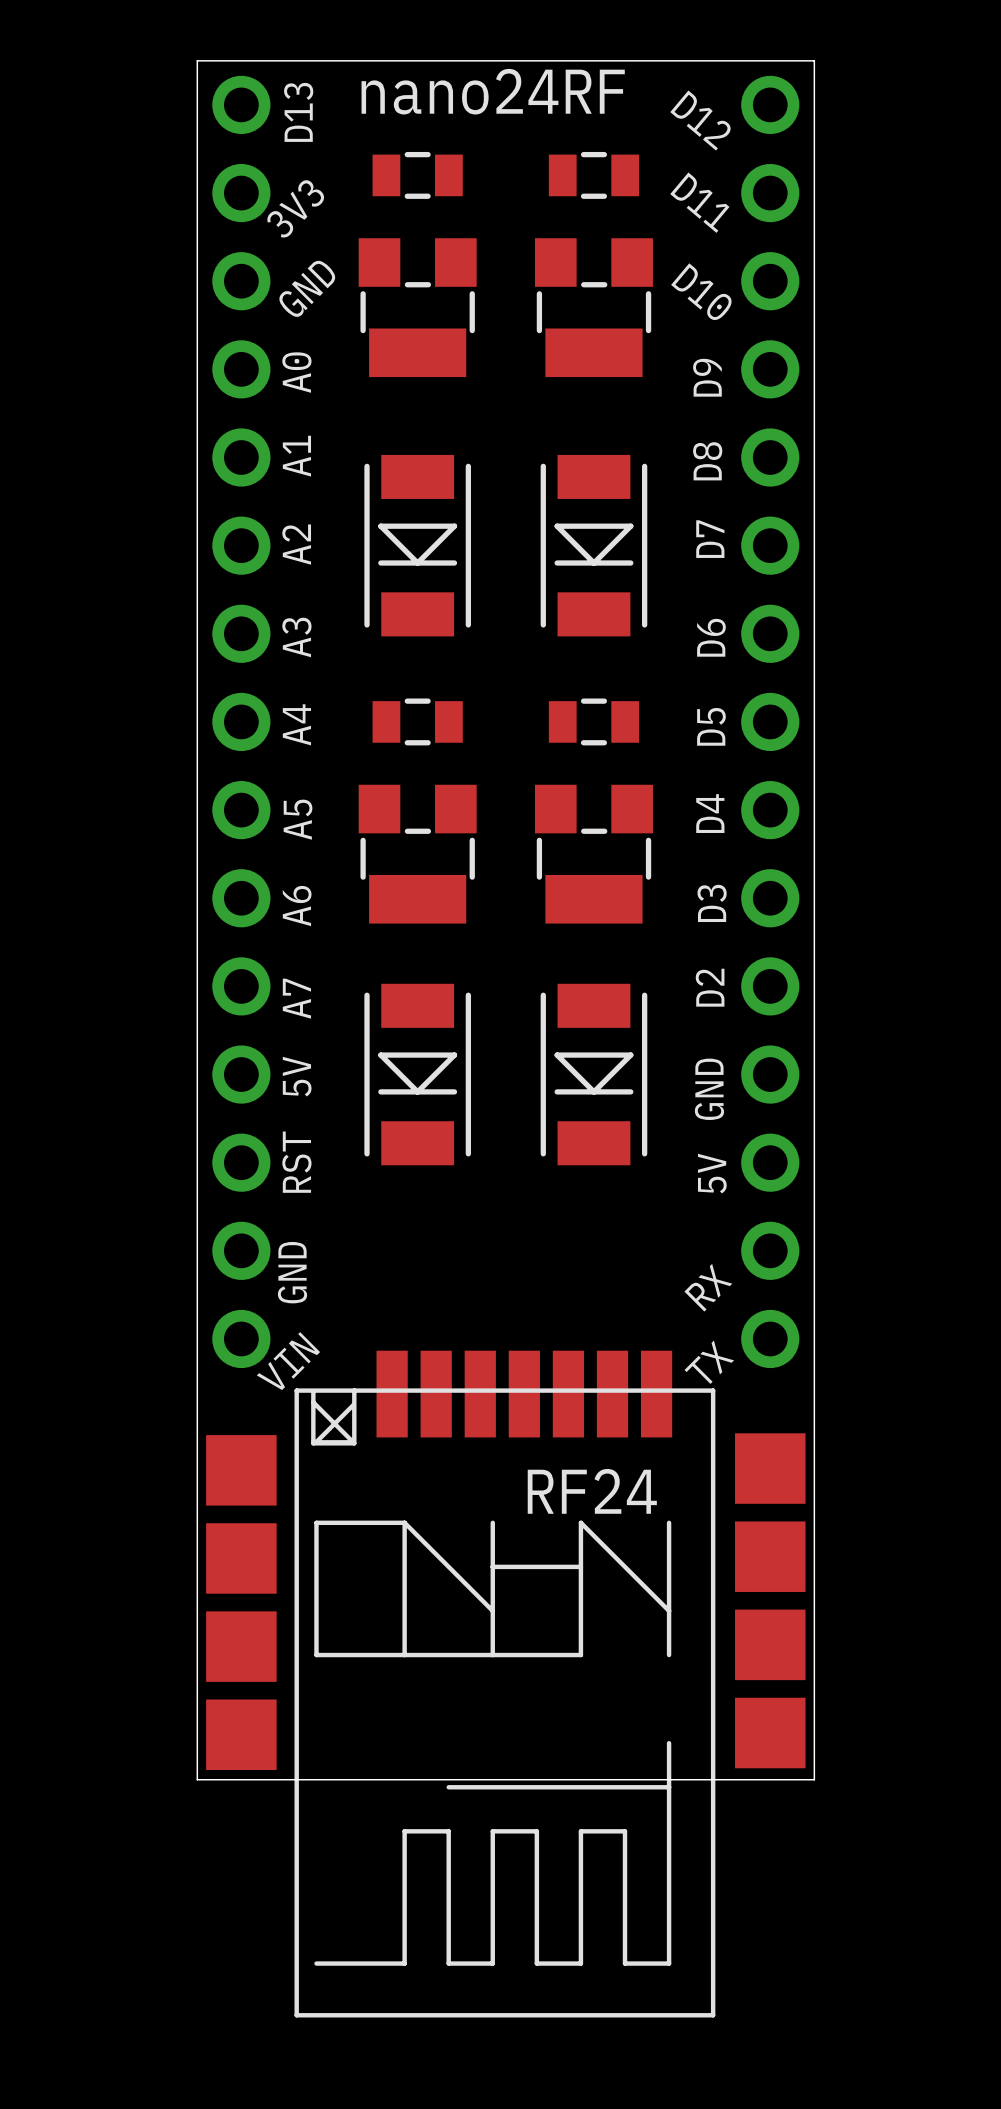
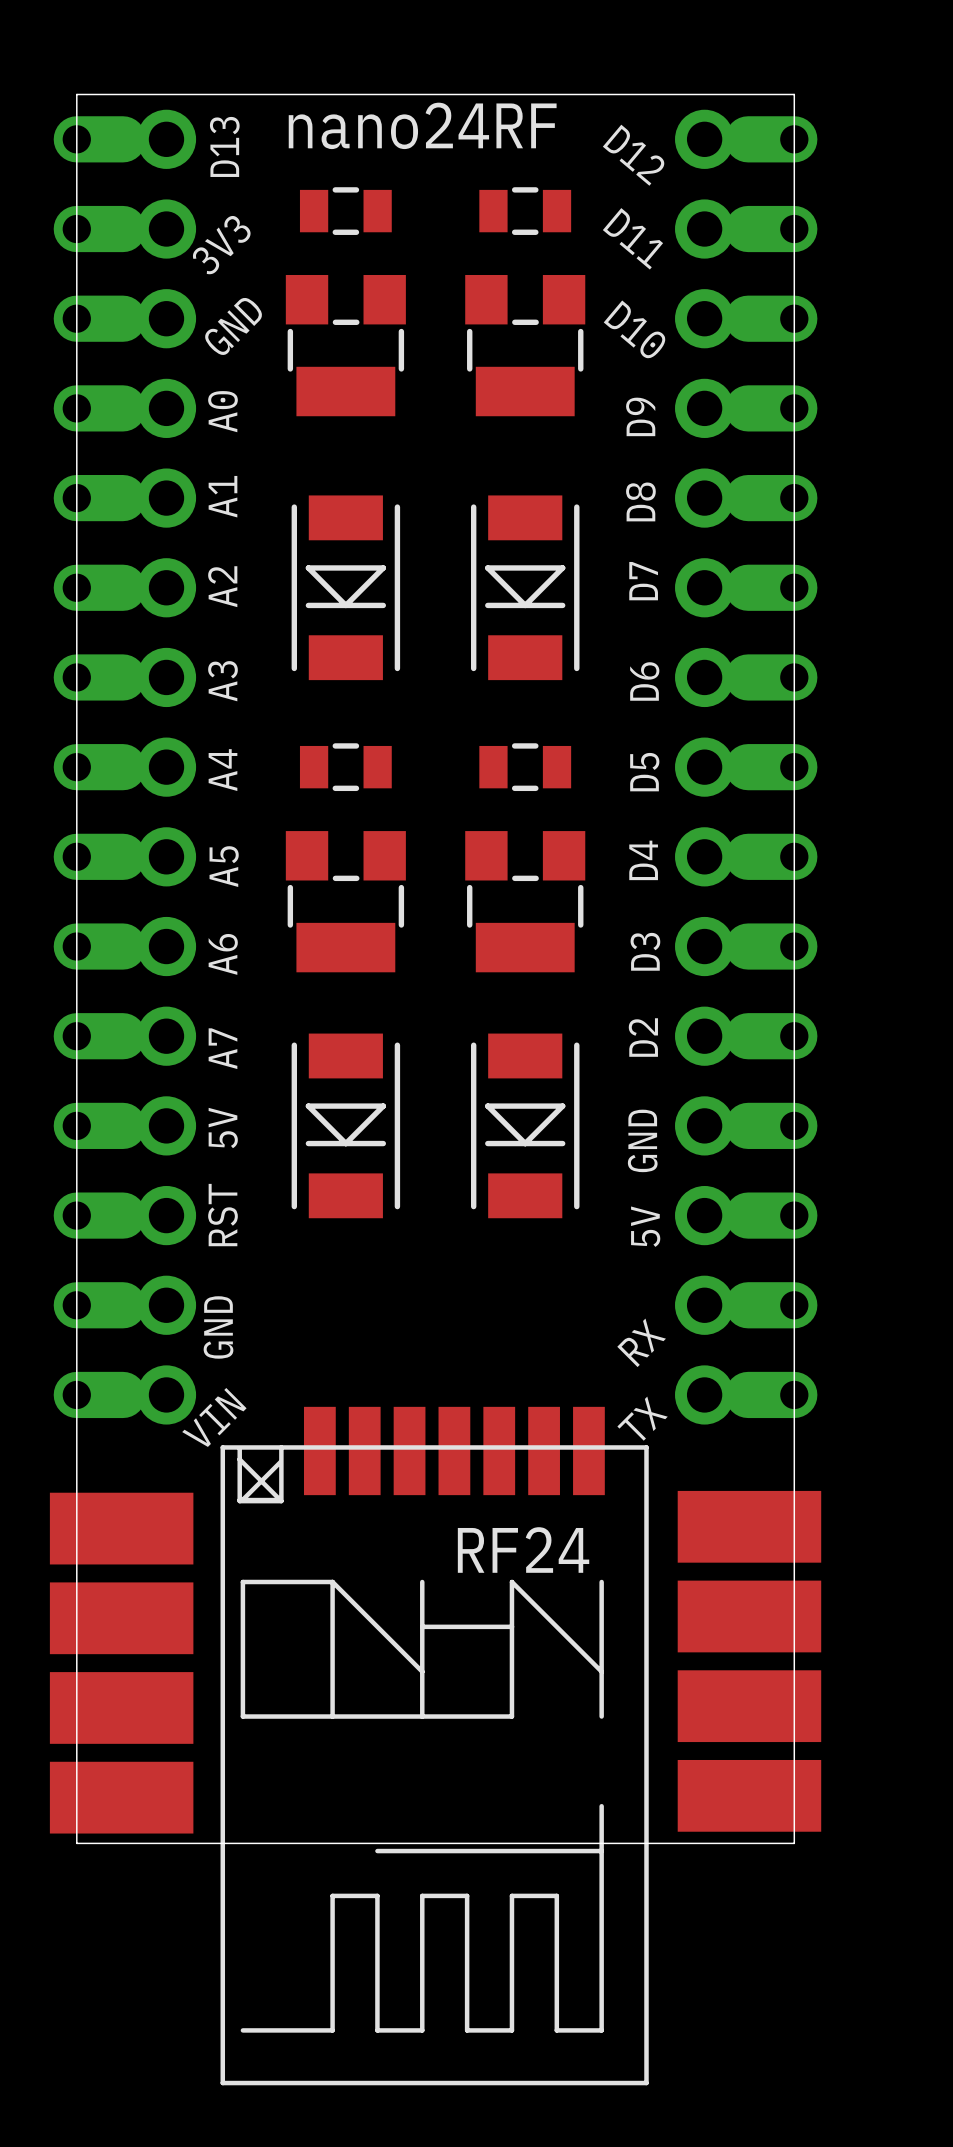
board edge: (197, 60) (197, 1779) -> (121, 94) (76, 94) (76, 1843) (121, 1843)
board edge: (814, 60) (814, 1779) -> (749, 94) (794, 94) (794, 1843) (749, 1843)
part: none -> (99, 767)
part: none -> (771, 767)
part: (770, 1600) -> none
part: none -> (749, 1661)
part: none -> (121, 1663)
part: (241, 1602) -> none

